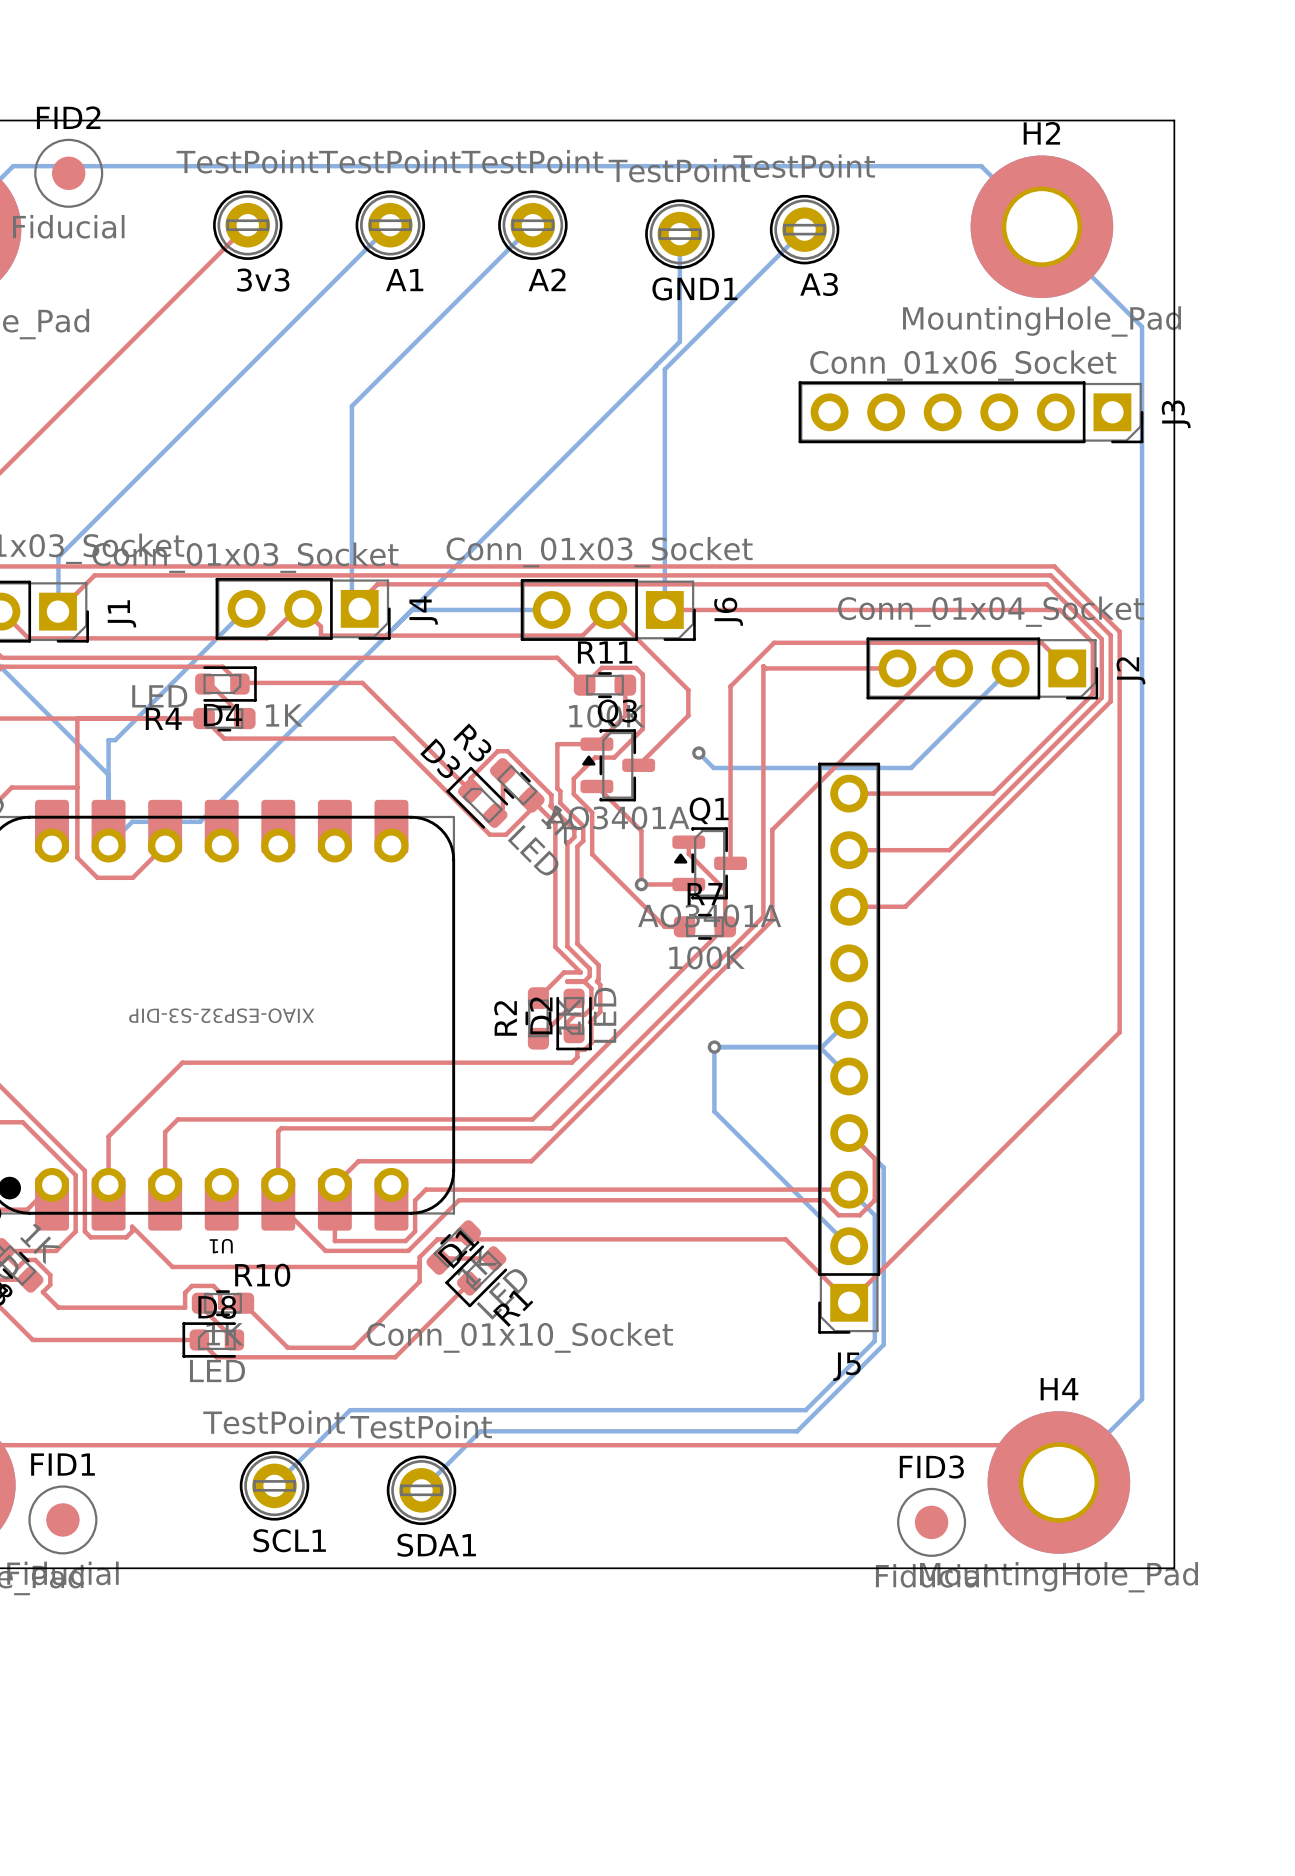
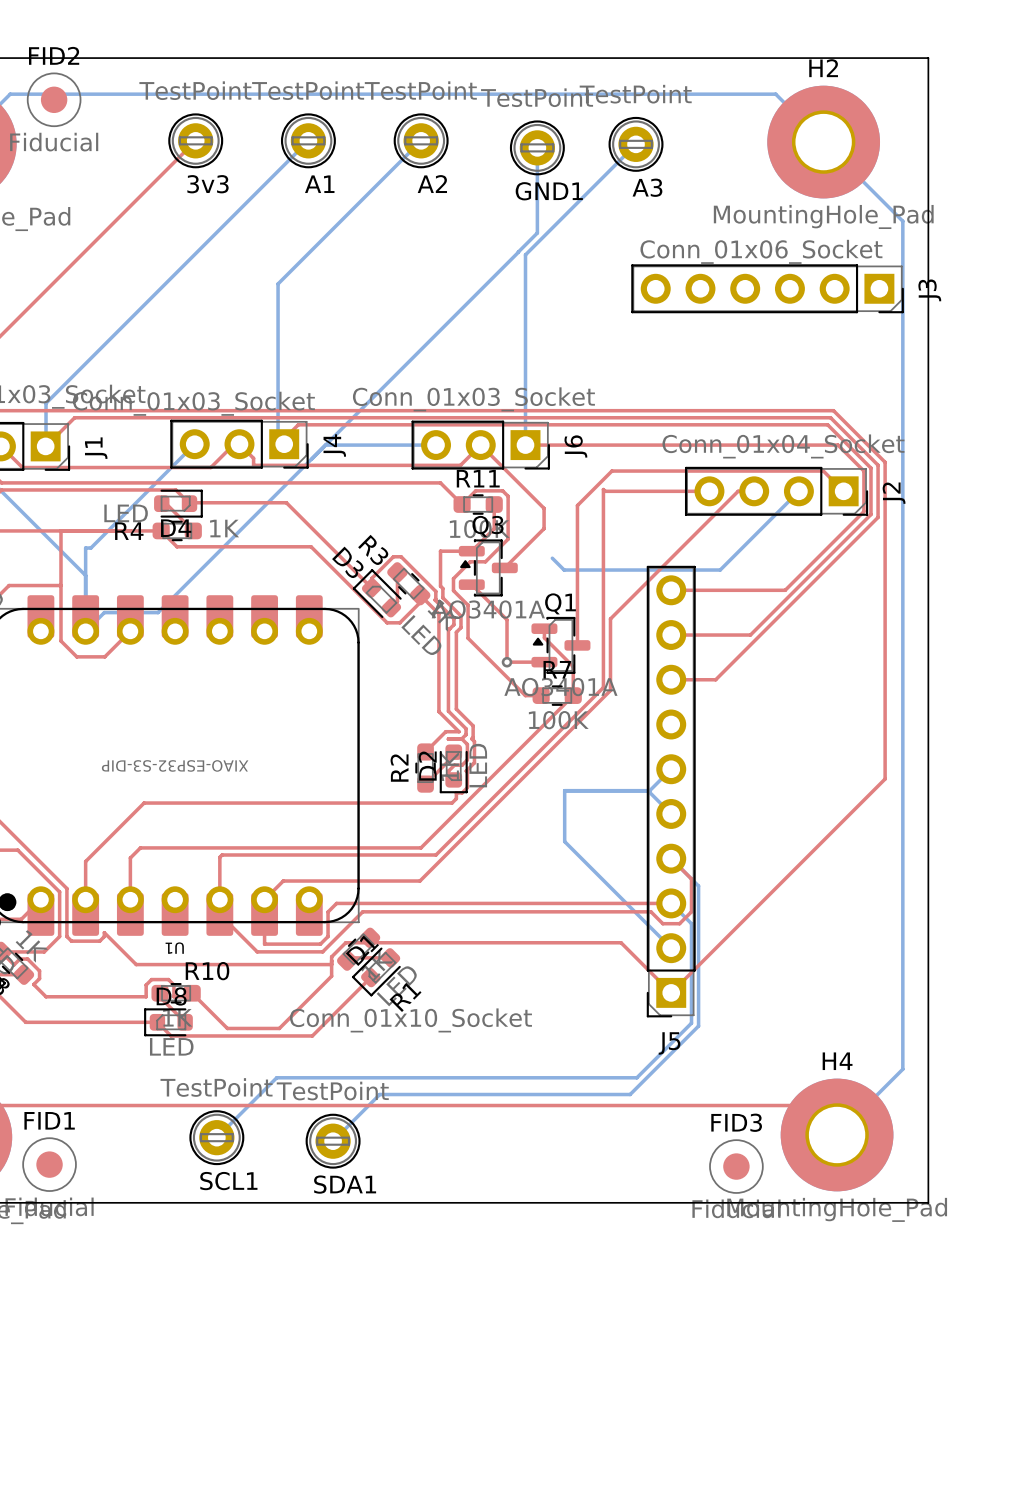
via: (698, 753) -> none
via: (714, 1047) -> none

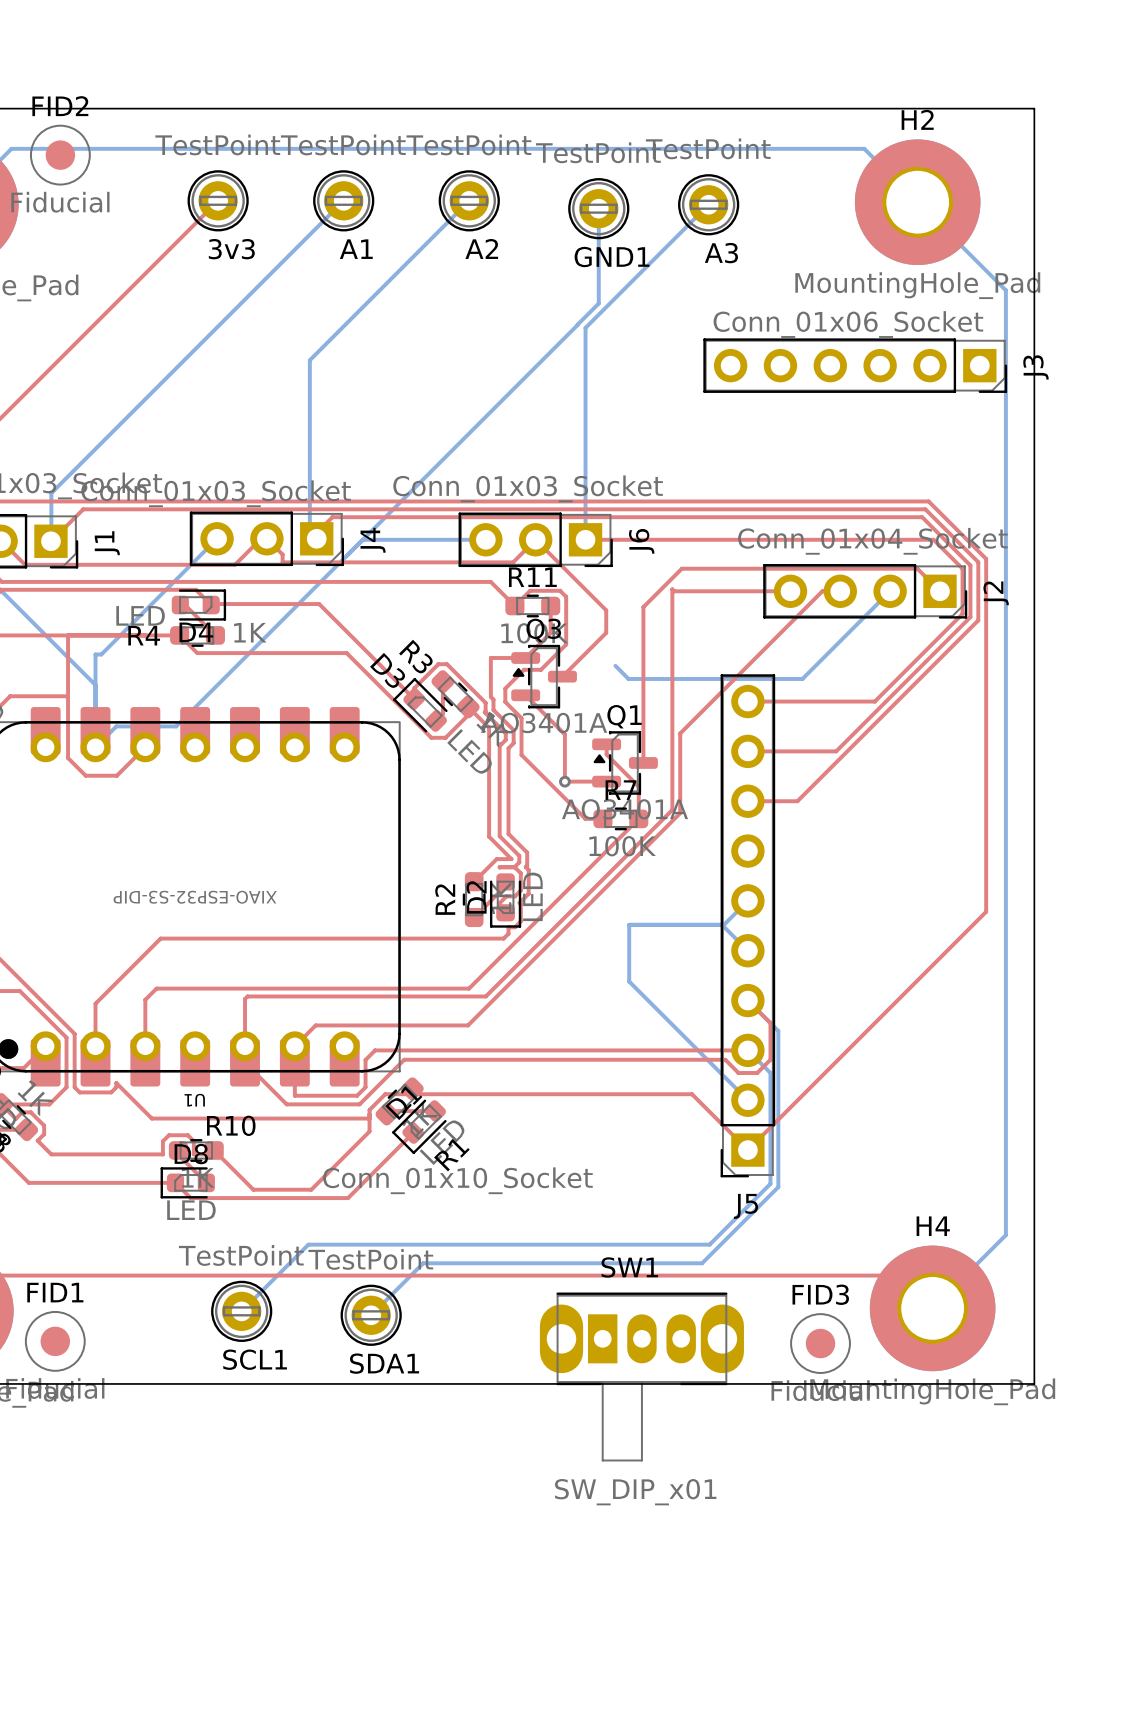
SW1: none -> SW_DIP_x01 (641, 1377)

